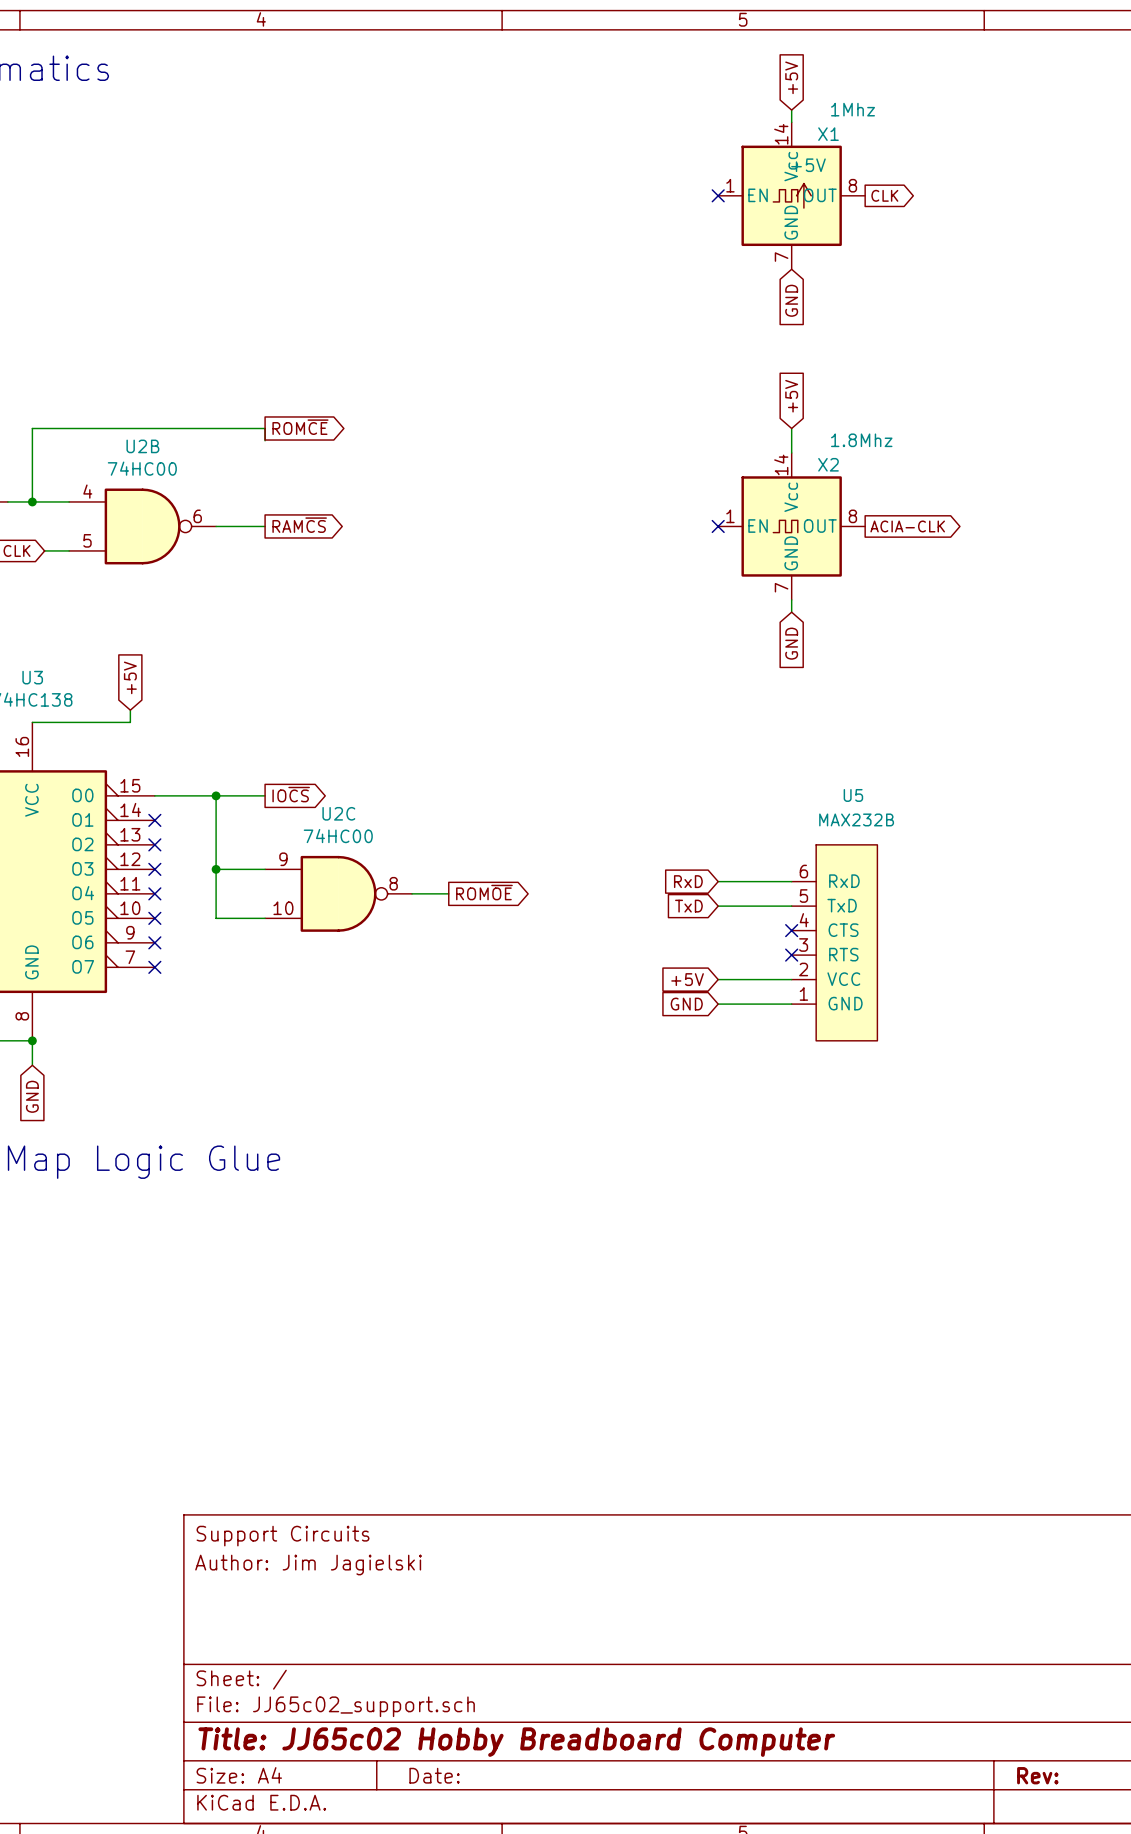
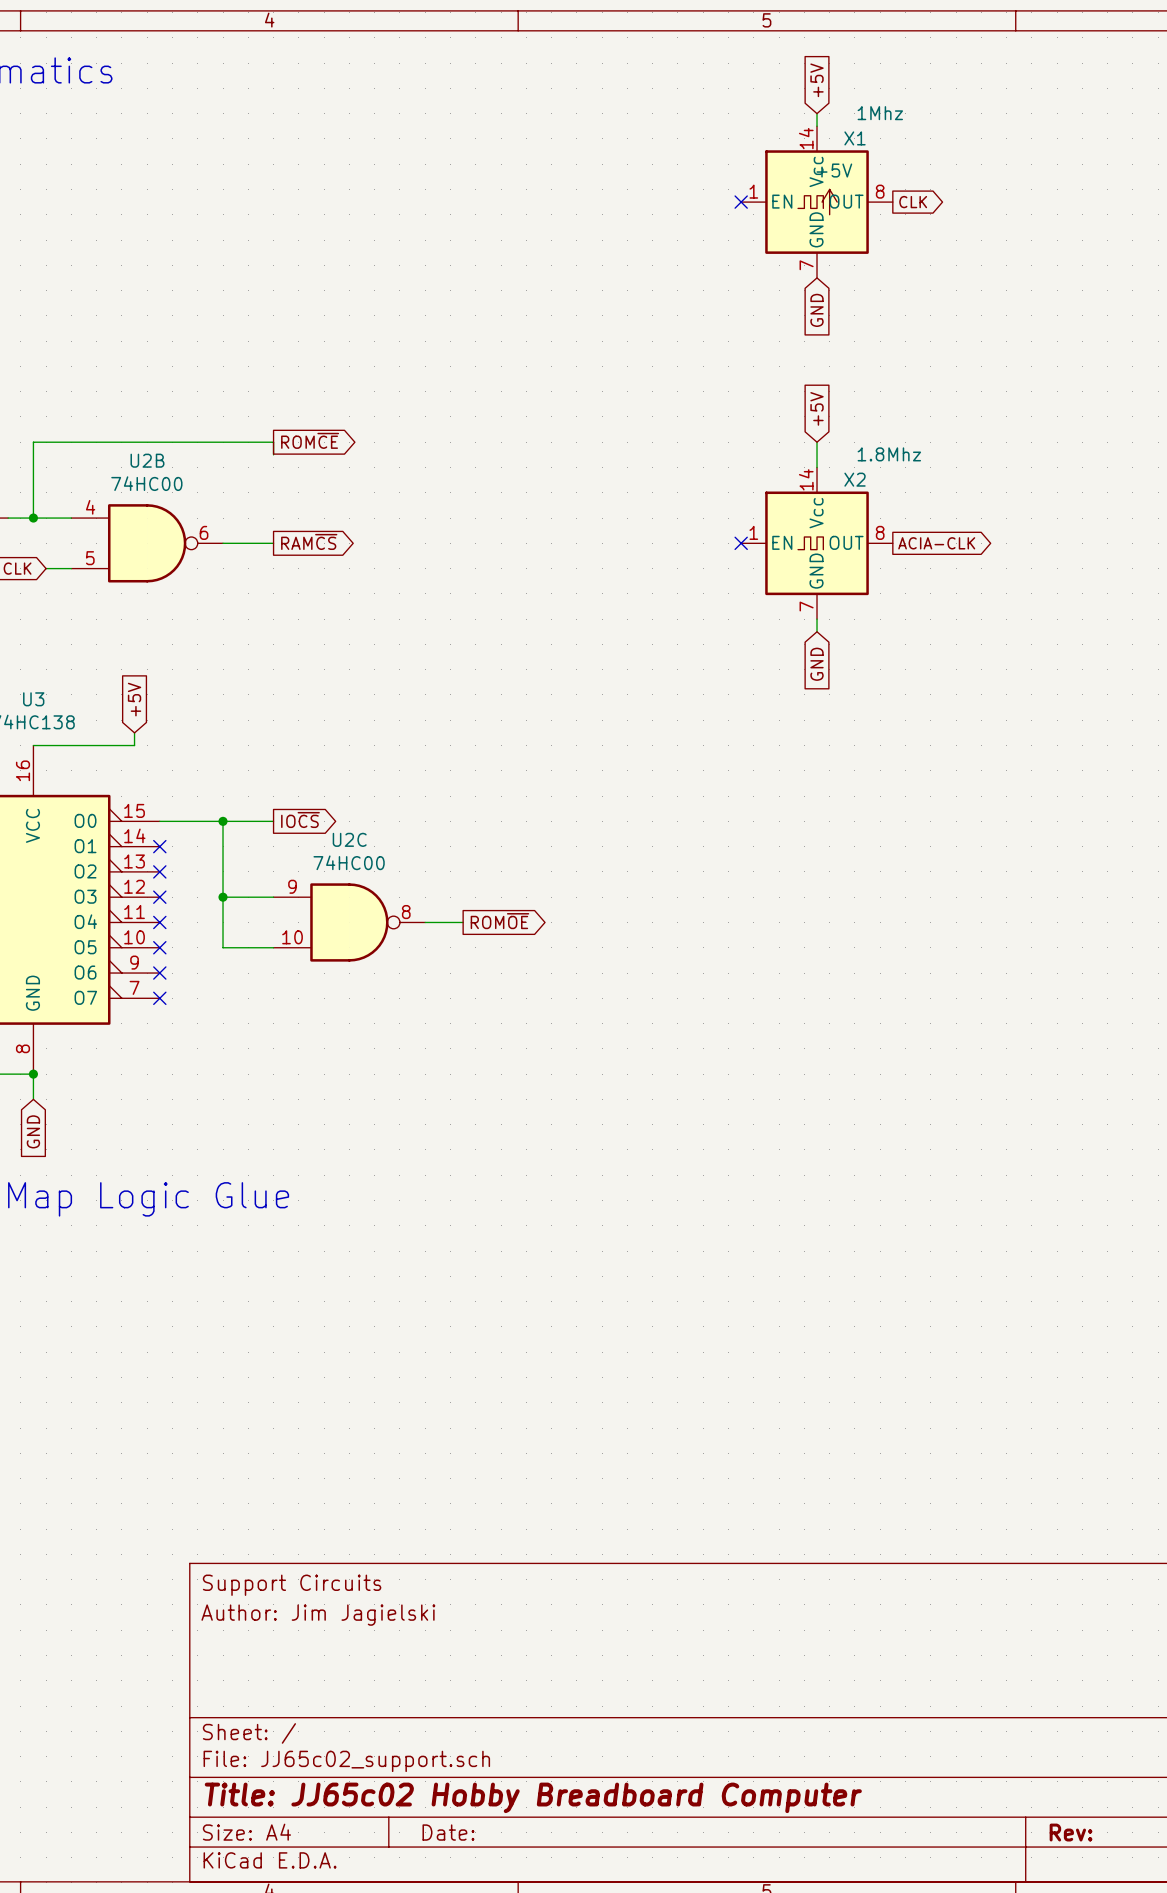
global label: RxD (688, 881) -> none
wire: (718, 881) (791, 881) -> none
global label: TxD (688, 906) -> none
wire: (718, 906) (791, 906) -> none
no-connect mark: (791, 930) -> none
U5: MAX232B (834, 942) -> none
no-connect mark: (791, 955) -> none
global label: +5V (687, 979) -> none
wire: (718, 979) (791, 979) -> none
global label: GND (686, 1004) -> none
wire: (718, 1004) (791, 1004) -> none

